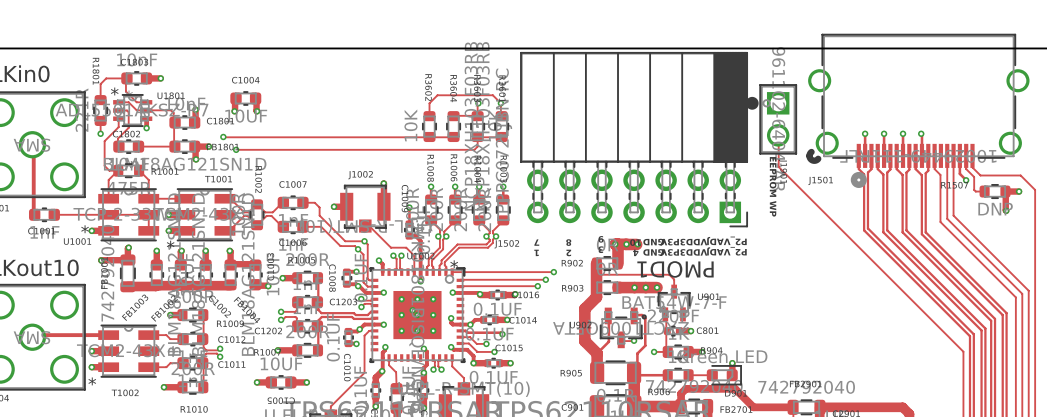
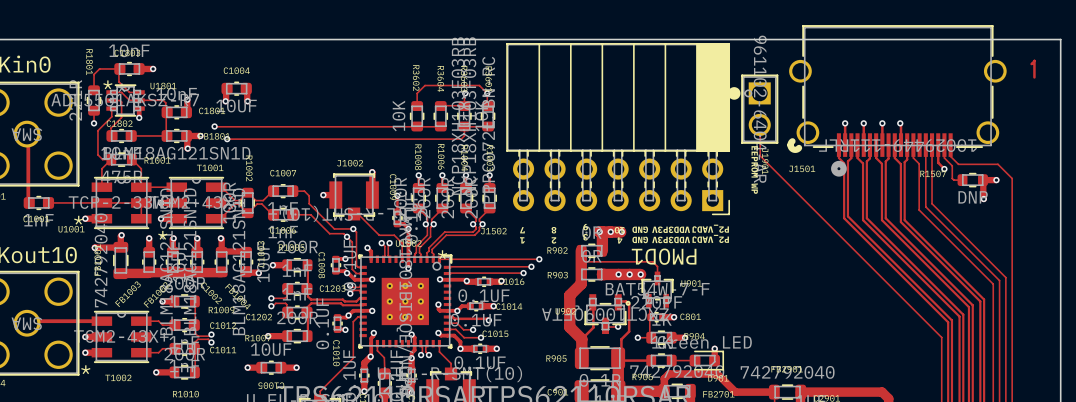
via position: (412, 310) -> (408, 228)

